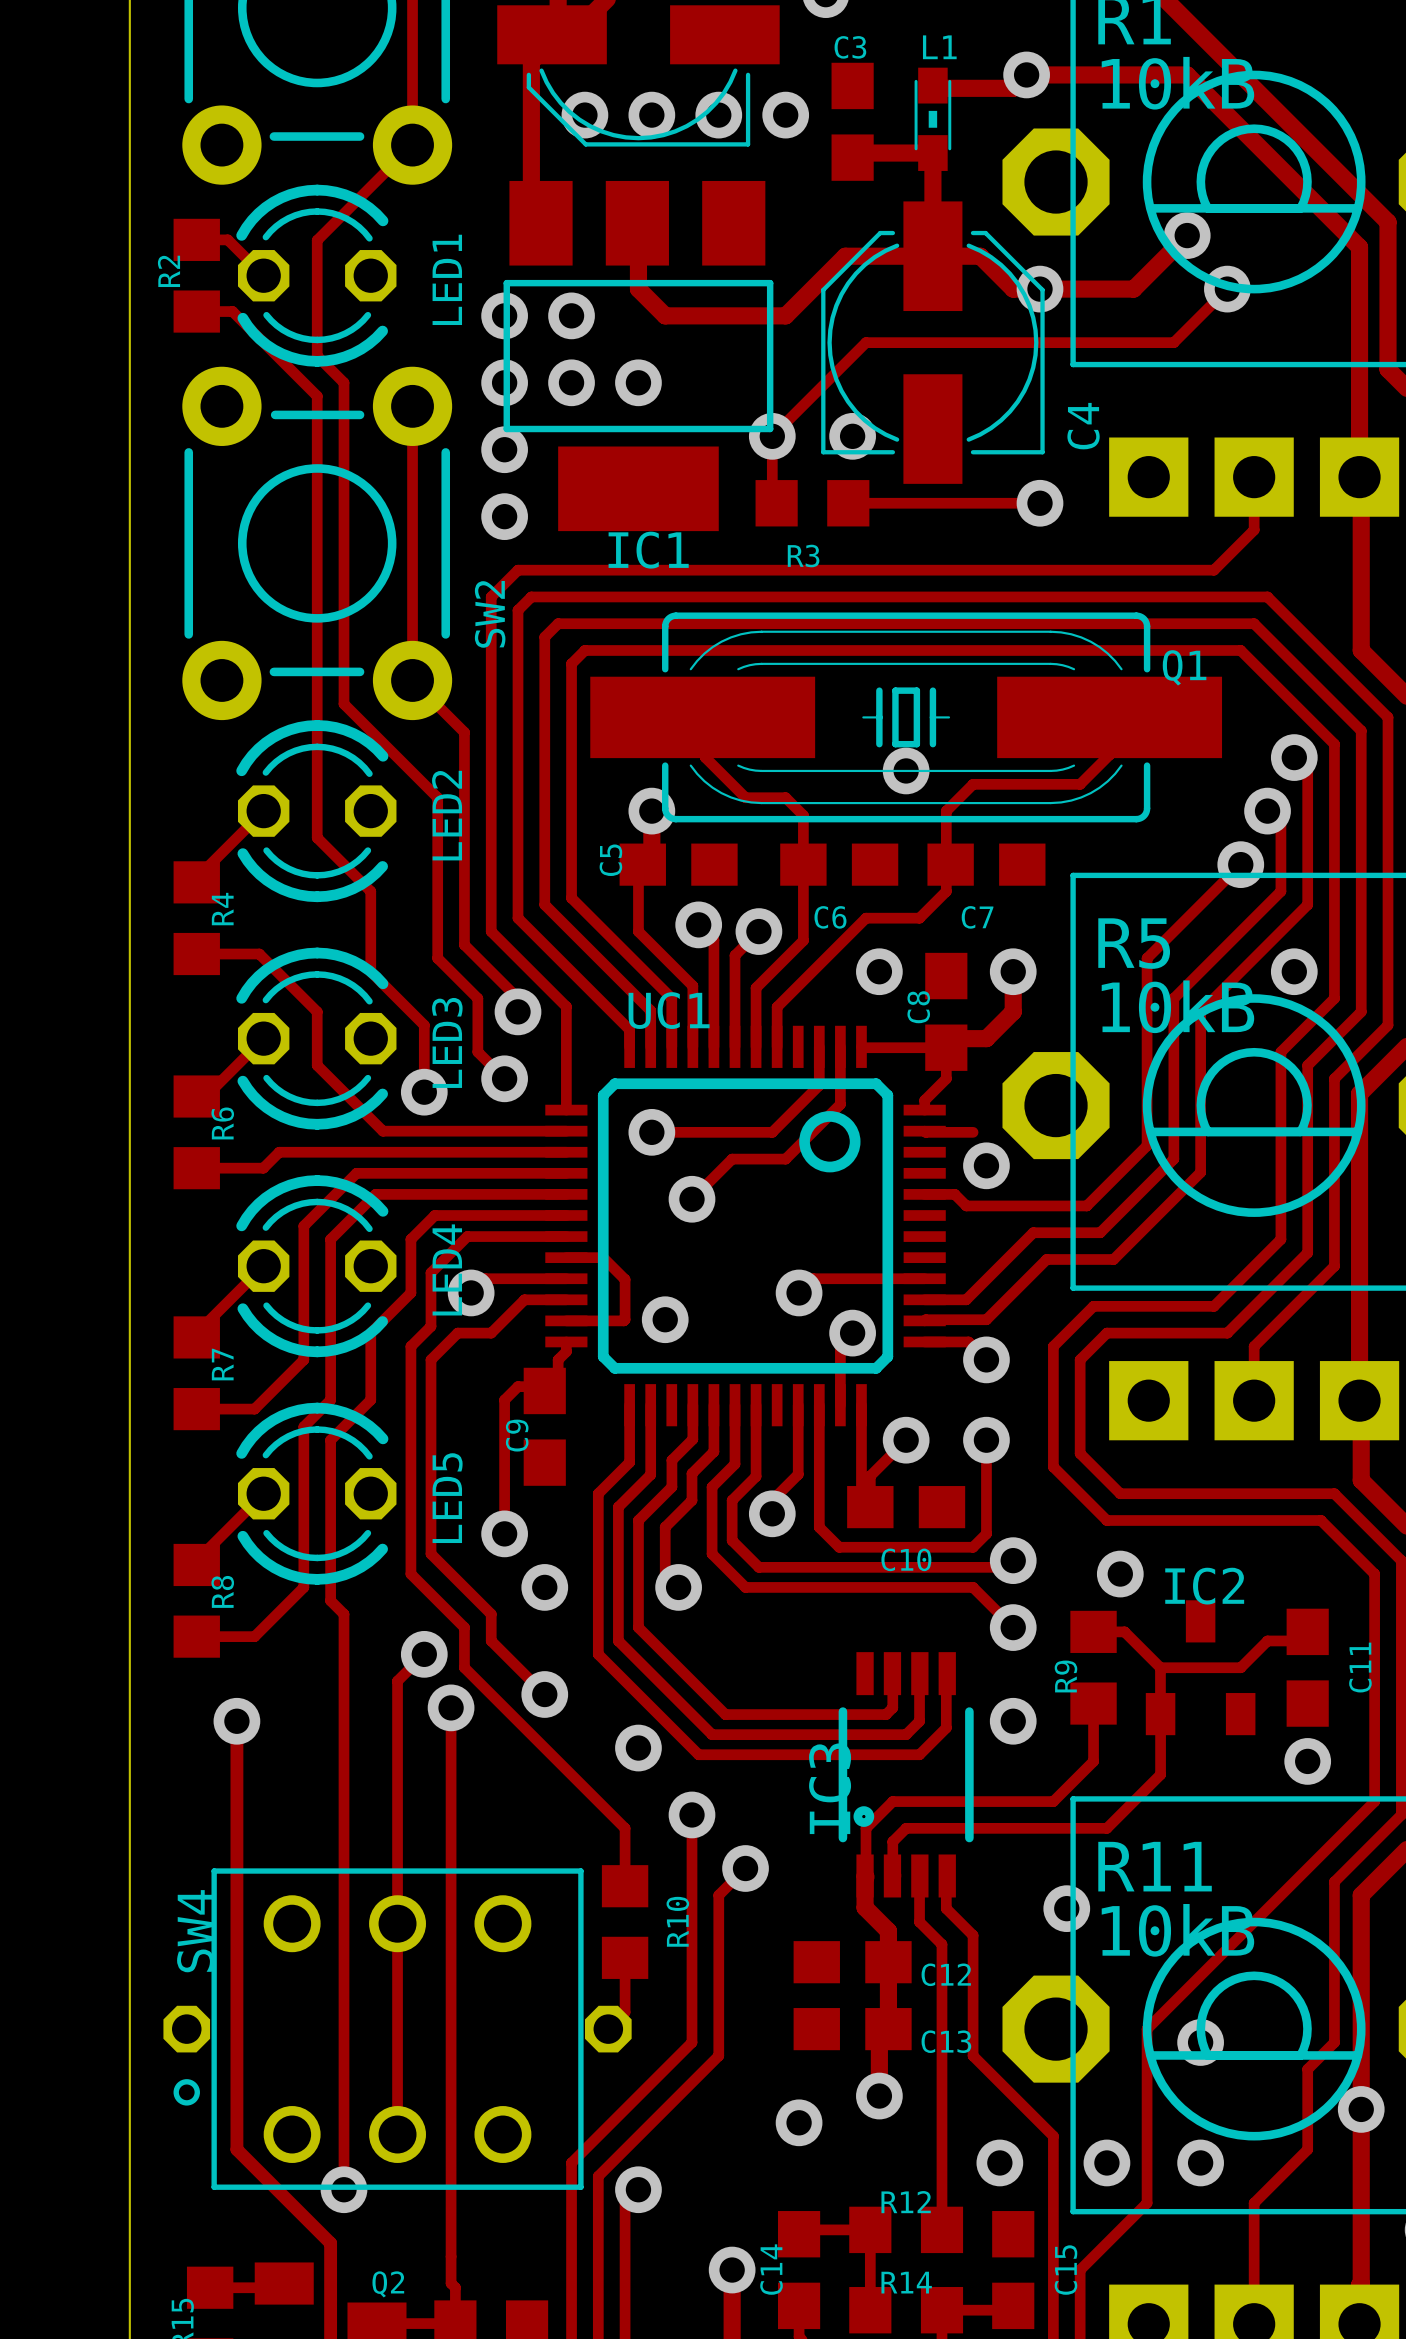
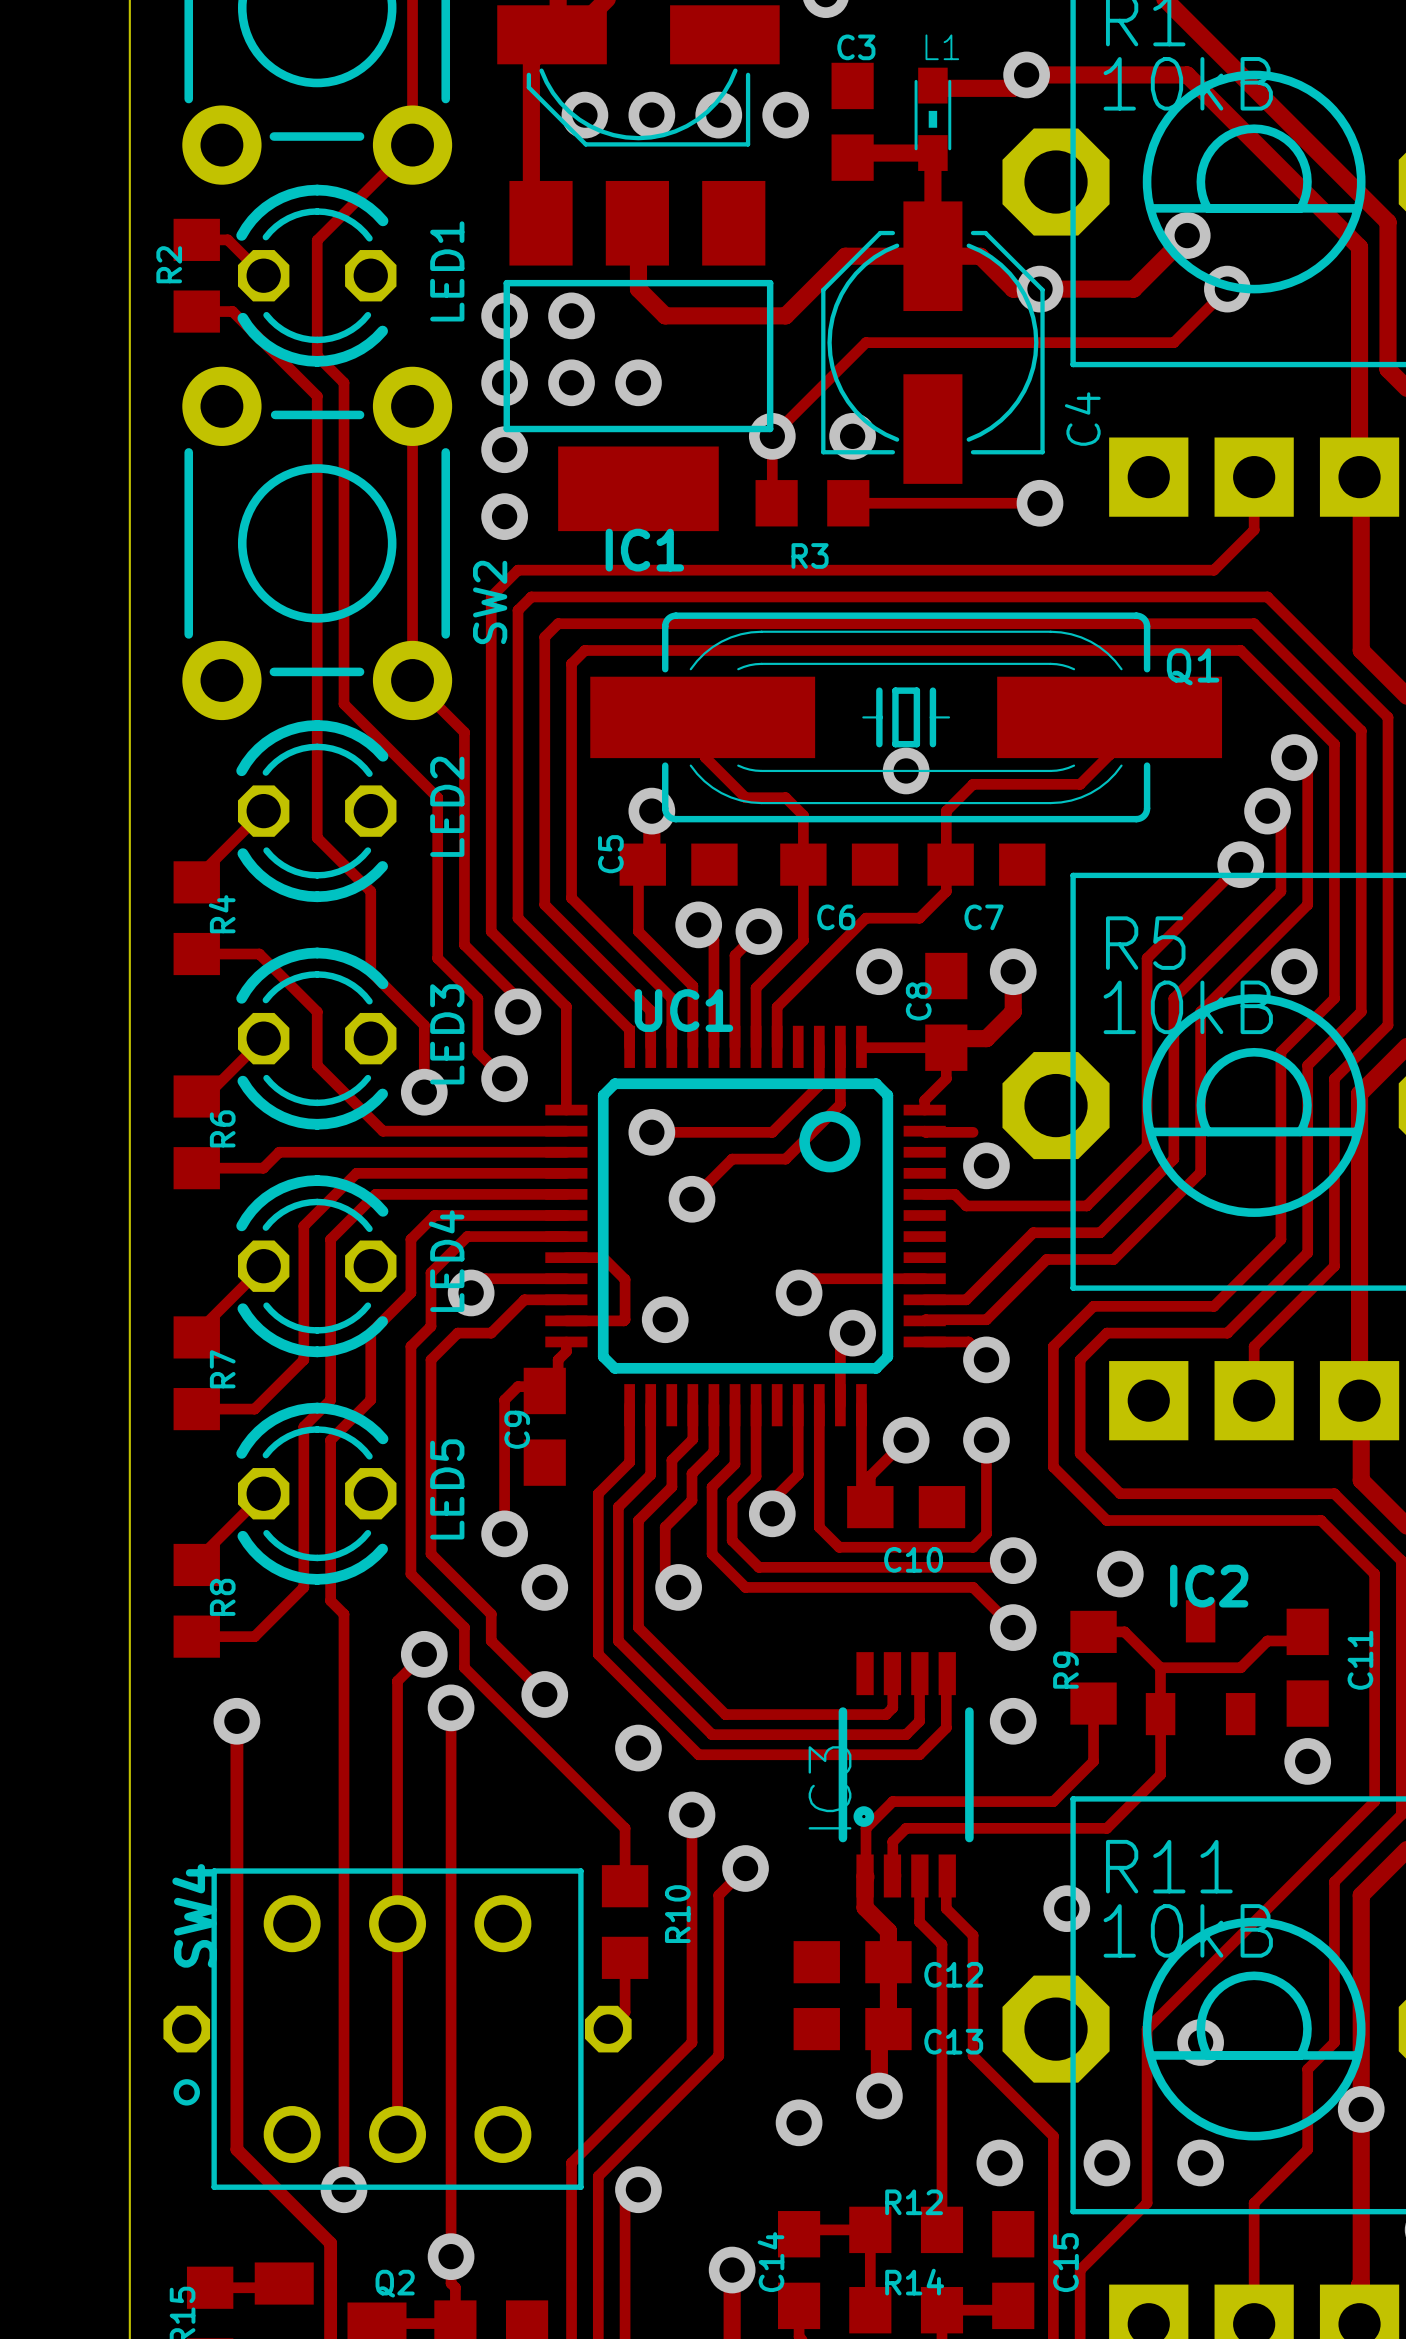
via: none -> (451, 2256)

